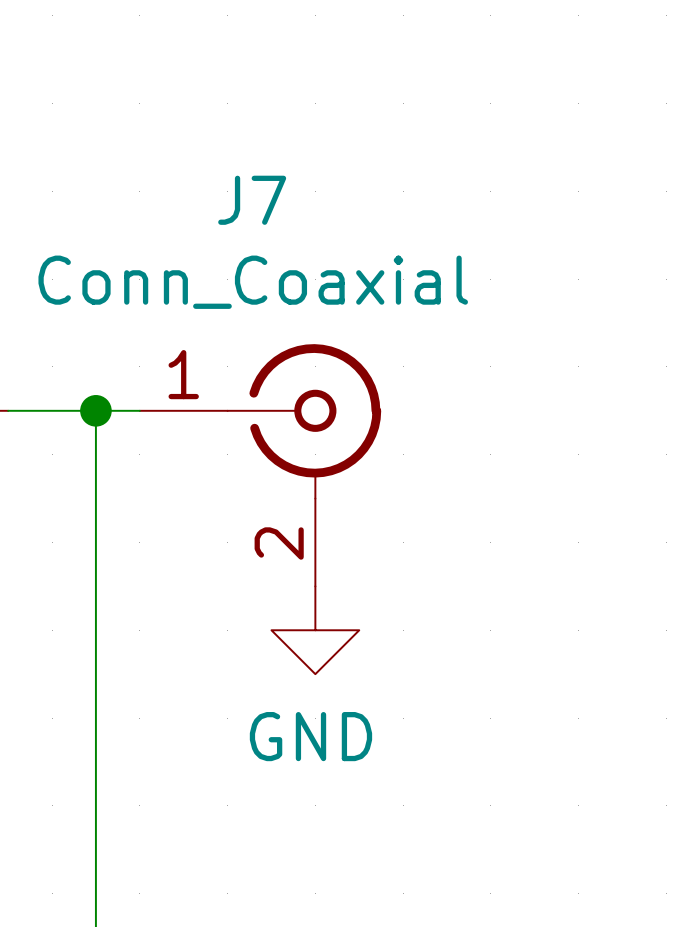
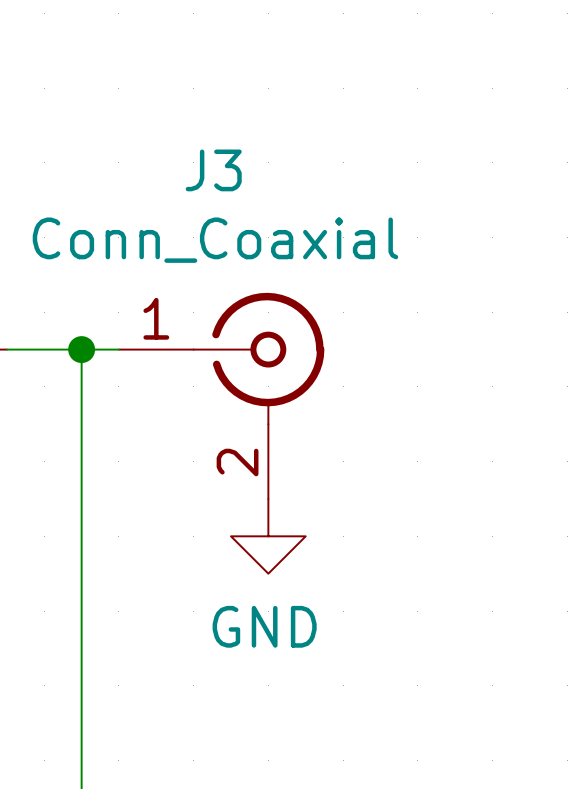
J7 name: J7 (252, 200) -> J3 (213, 170)

